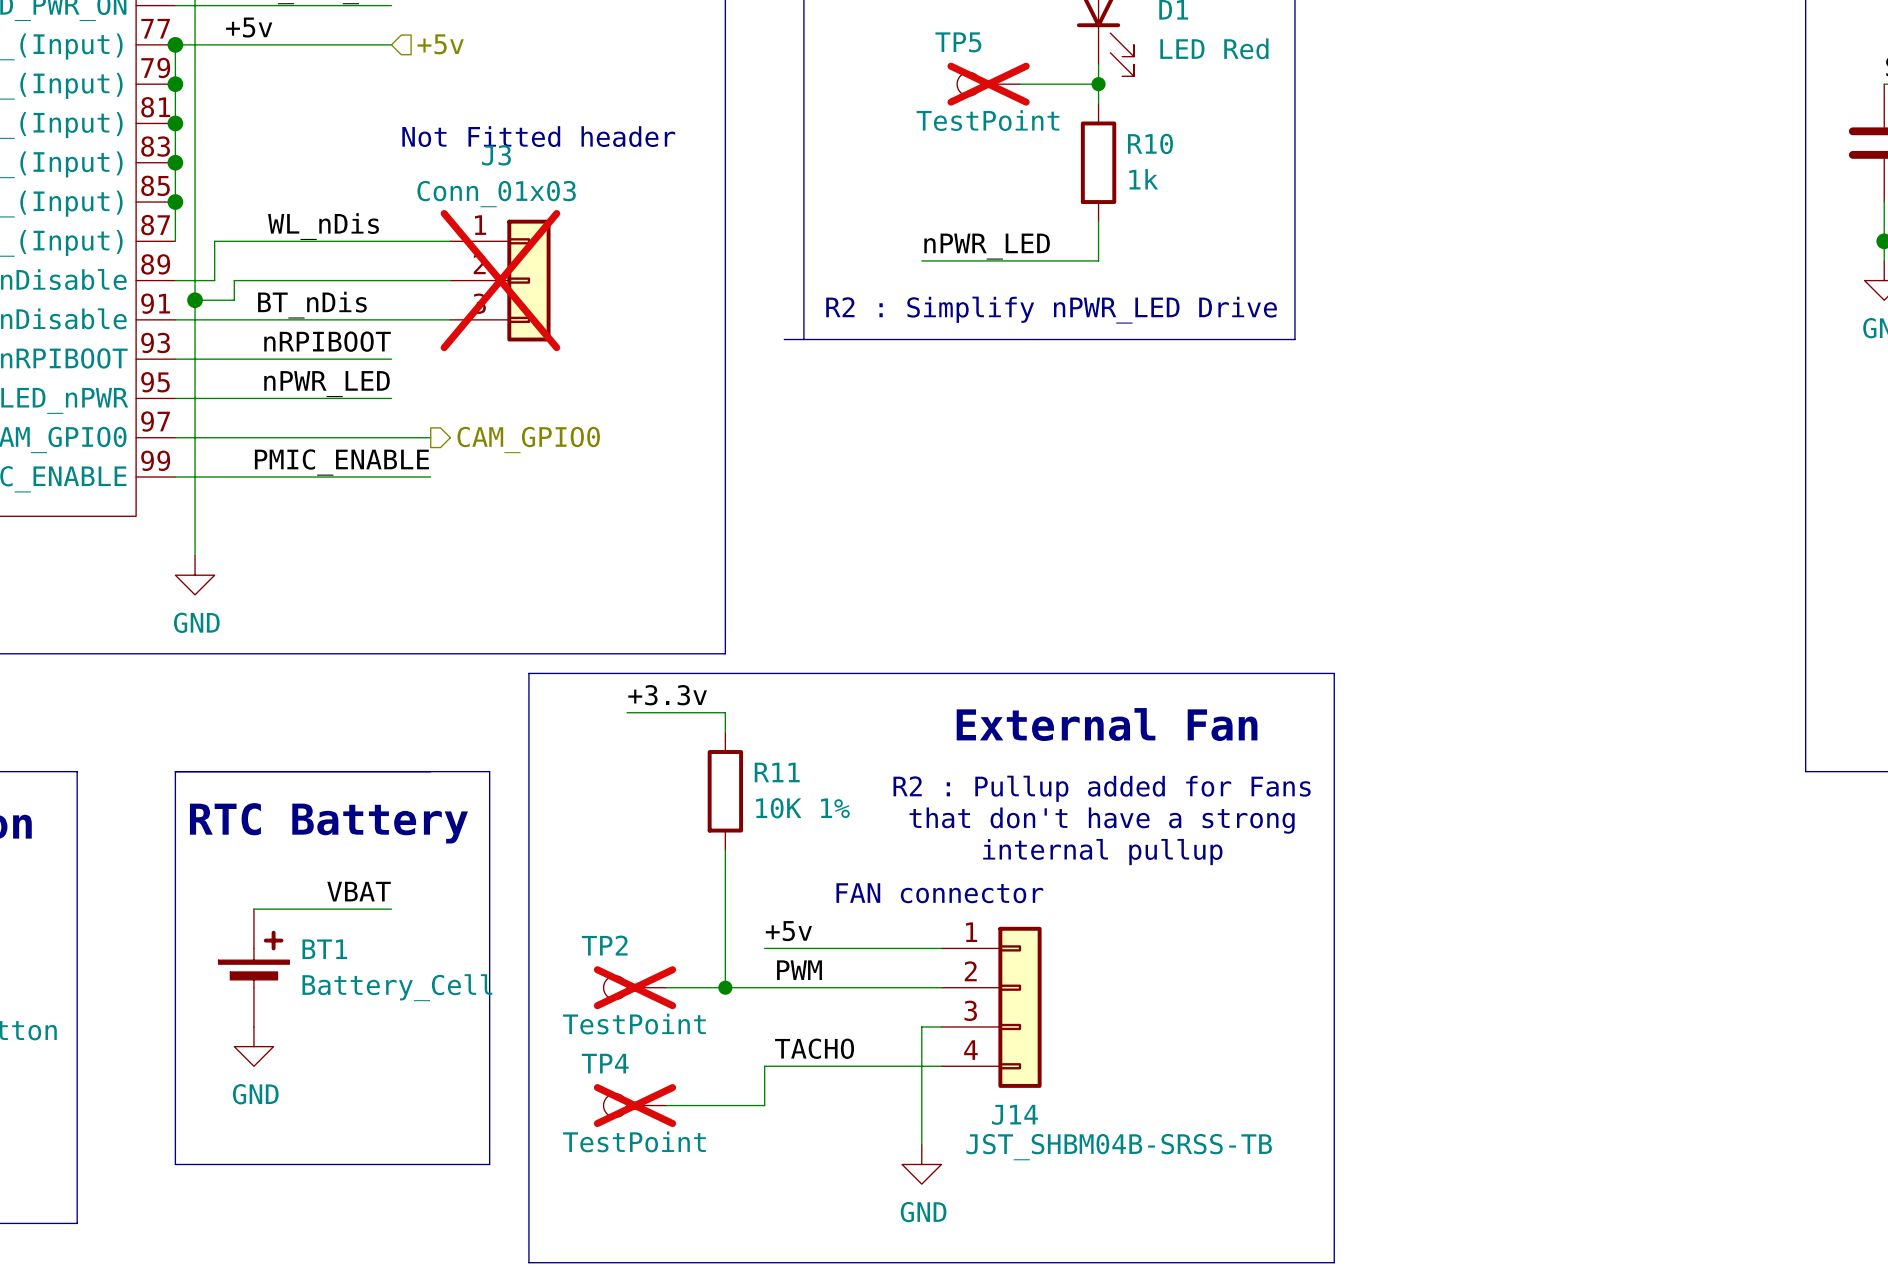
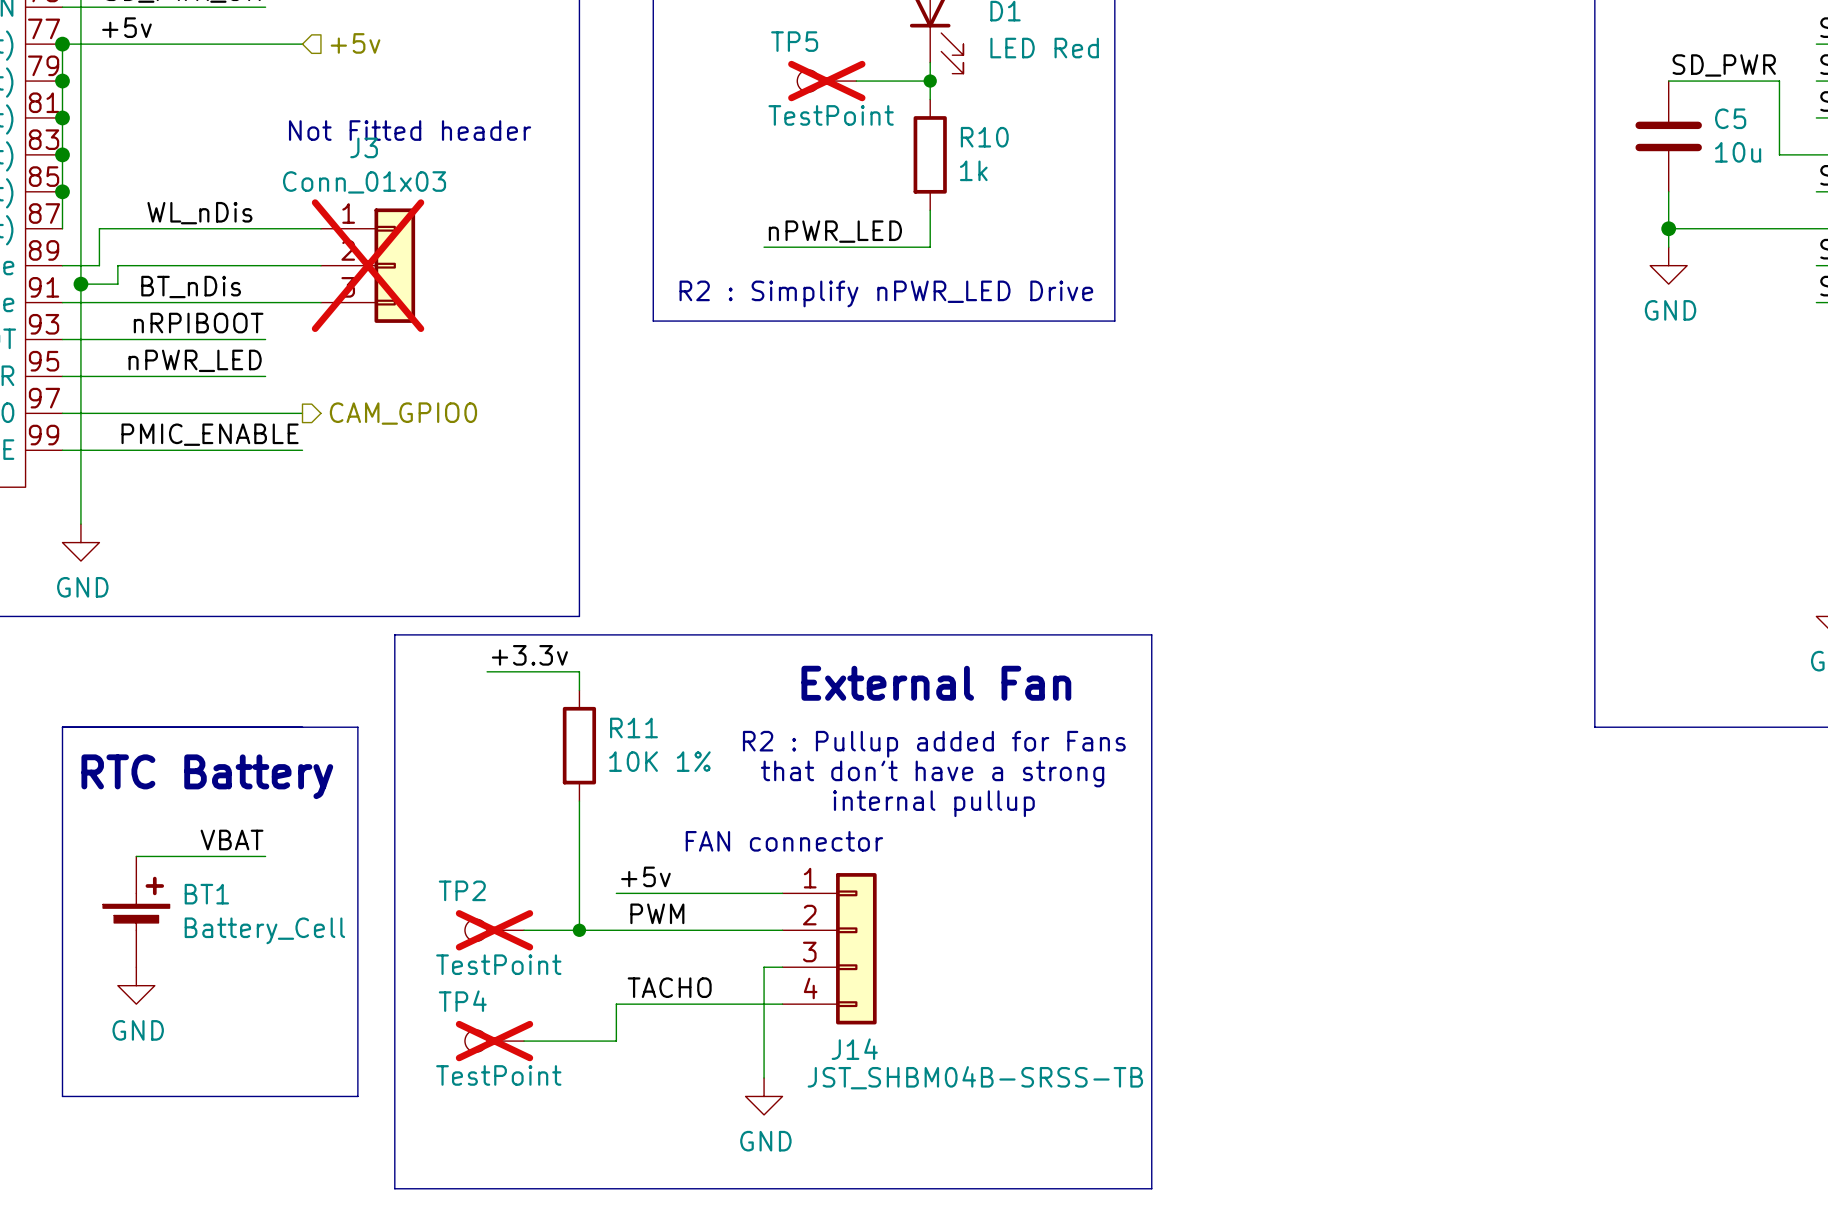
wire: none -> (265, 44) (302, 44)
hierarchical label position: +5v (440, 44) -> +5v (355, 43)
line: (784, 339) (803, 339) -> none

